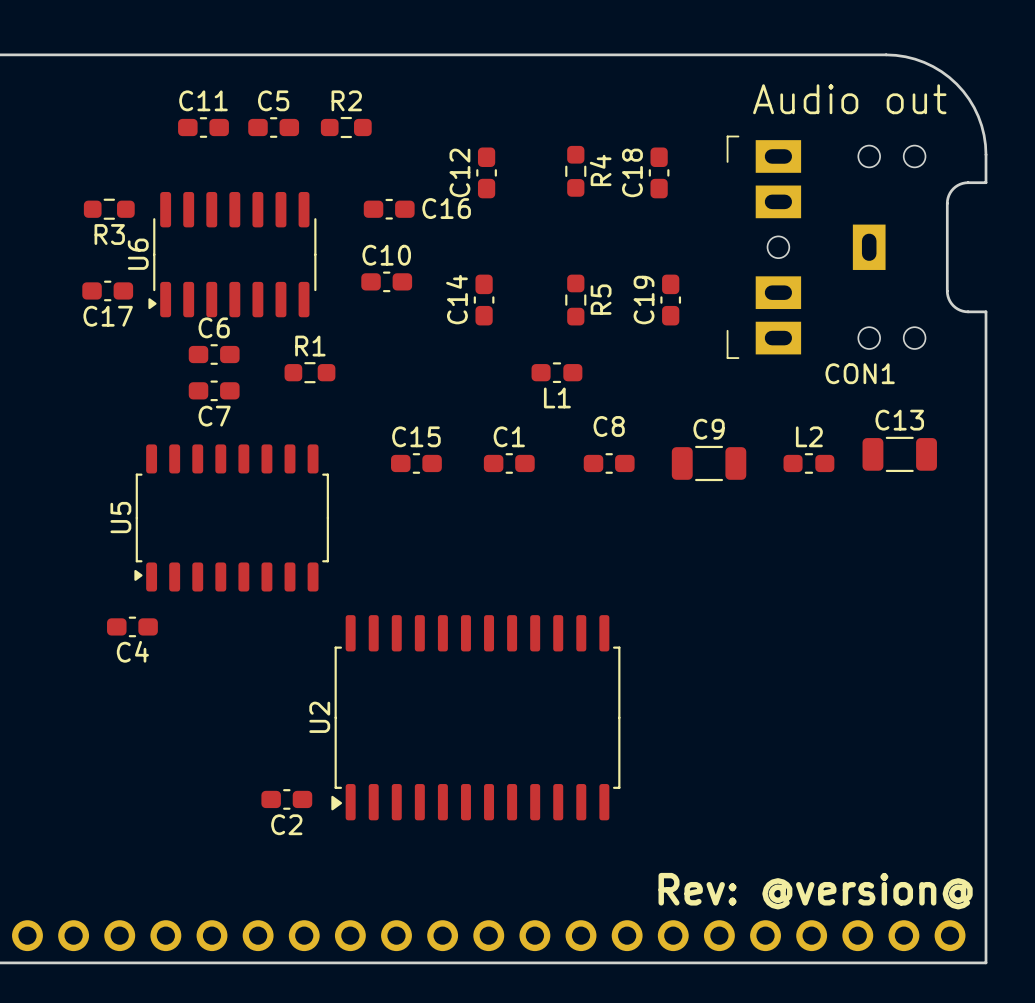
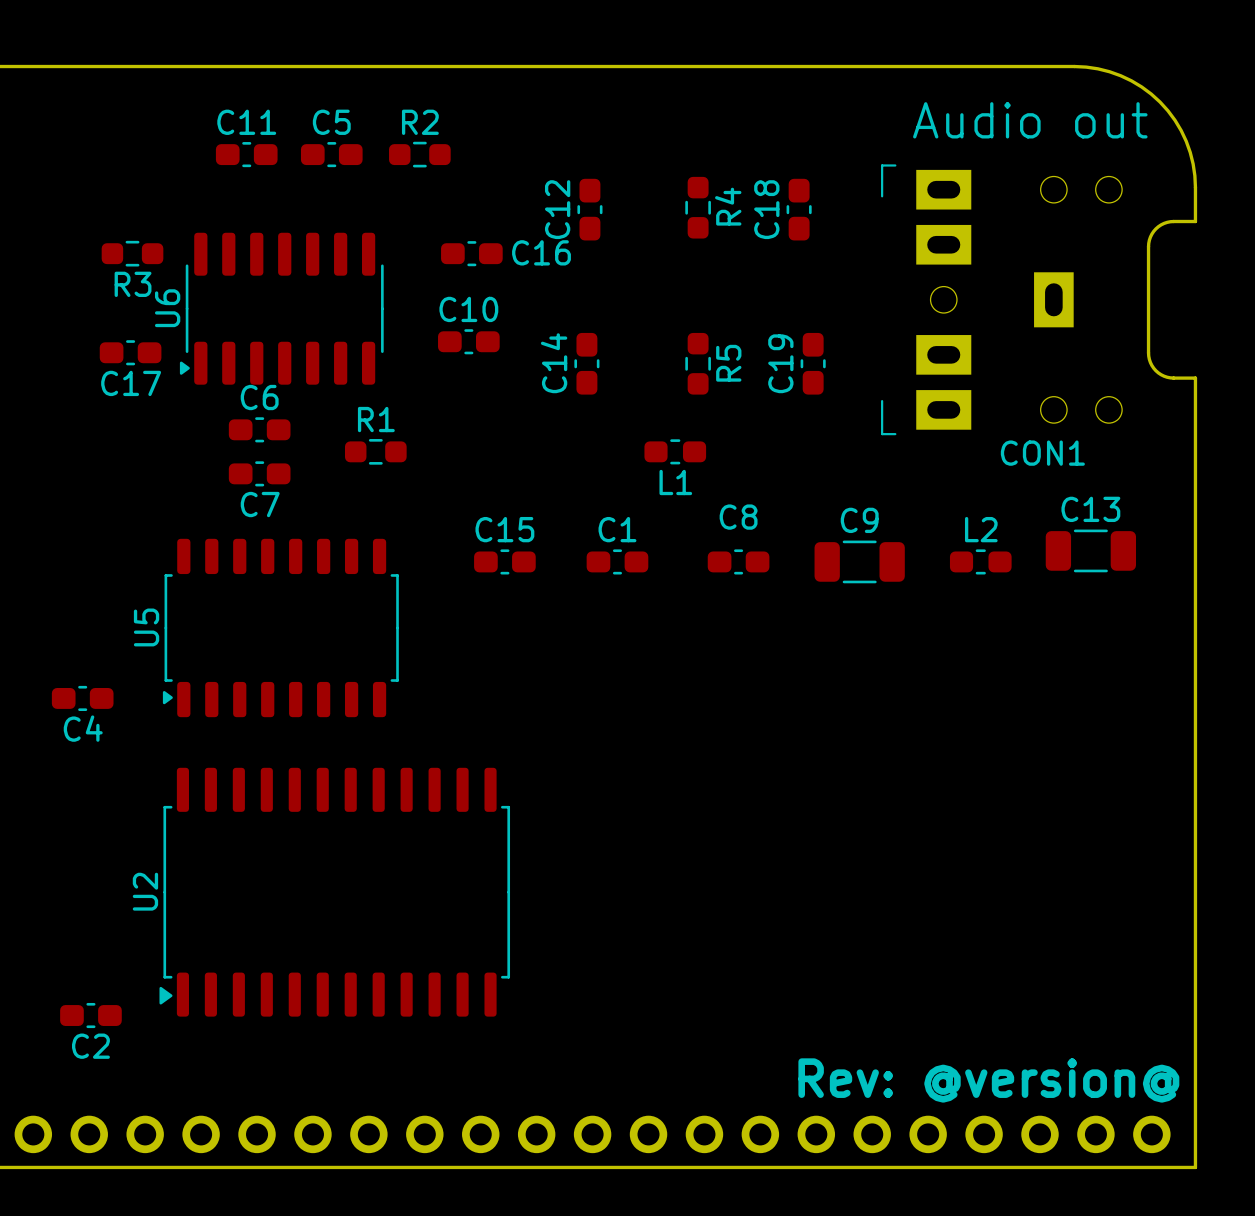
C4 position: (132, 626) -> (82, 698)
U2 position: (475, 717) -> (334, 892)
C2 position: (286, 799) -> (90, 1015)

